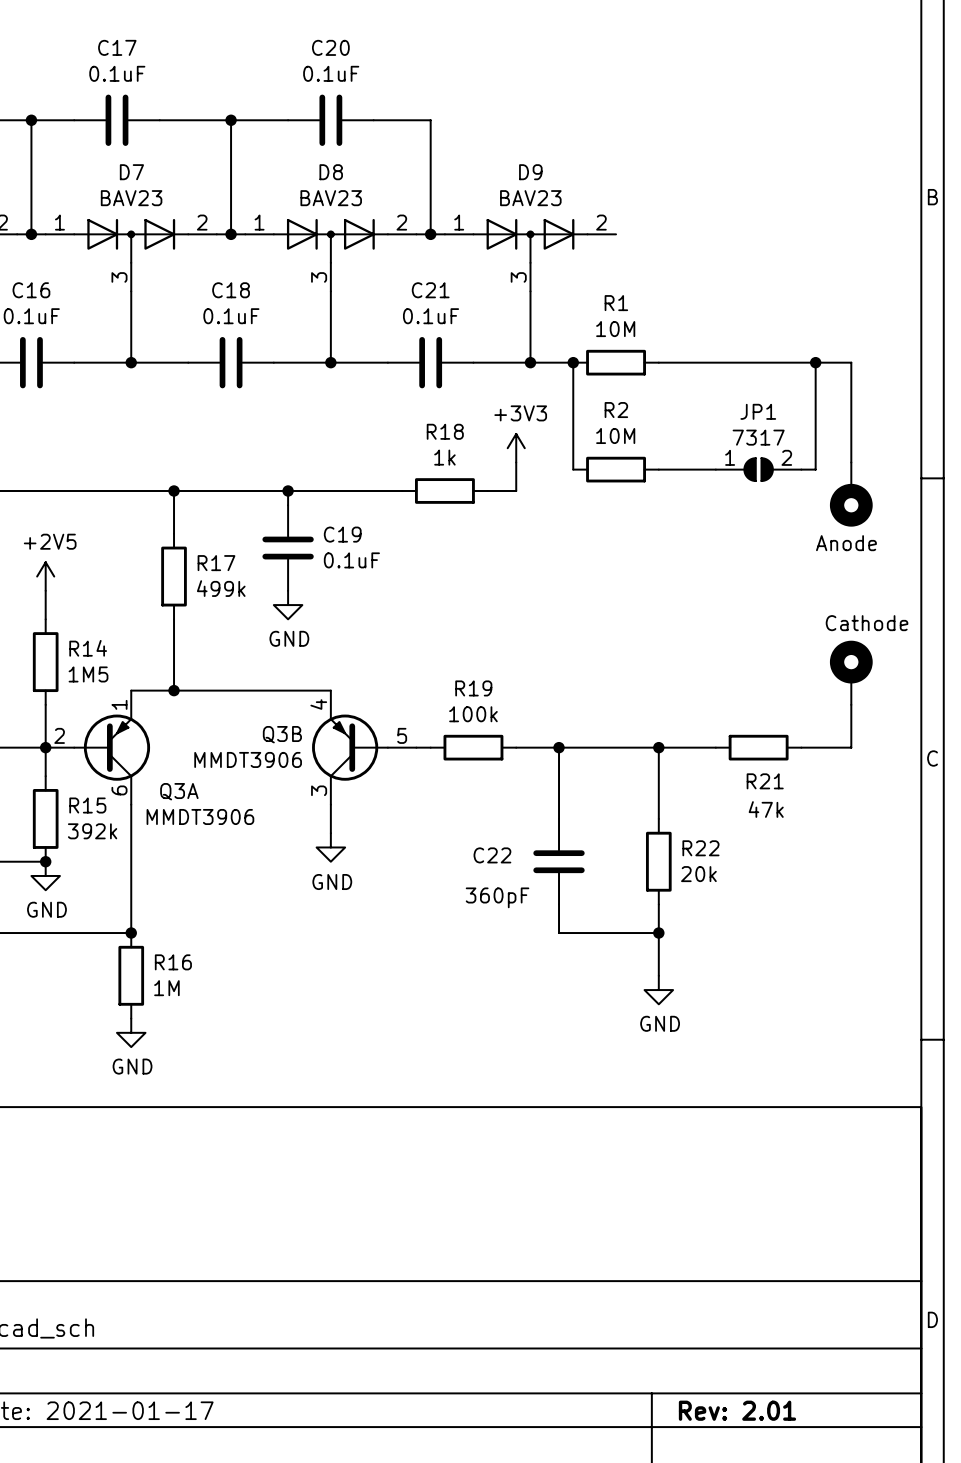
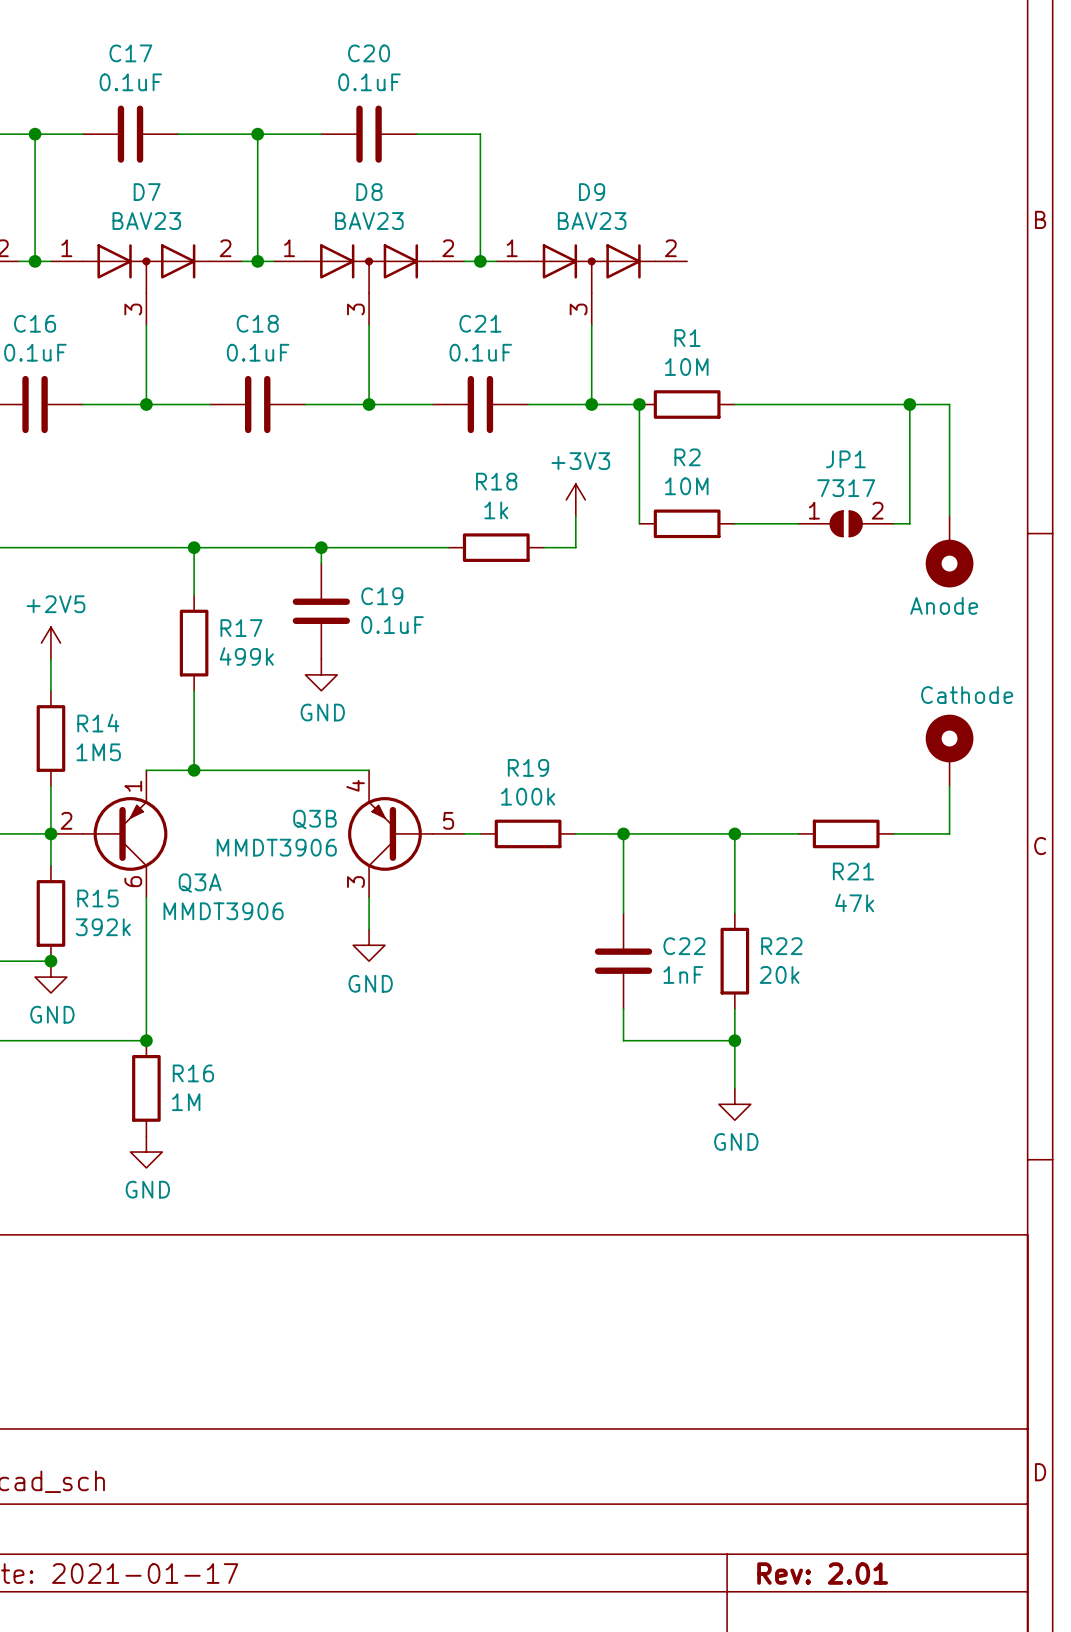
C22 name position: C22 (492, 855) -> C22 (684, 946)
C22 value: 360pF (497, 897) -> 1nF (683, 974)

